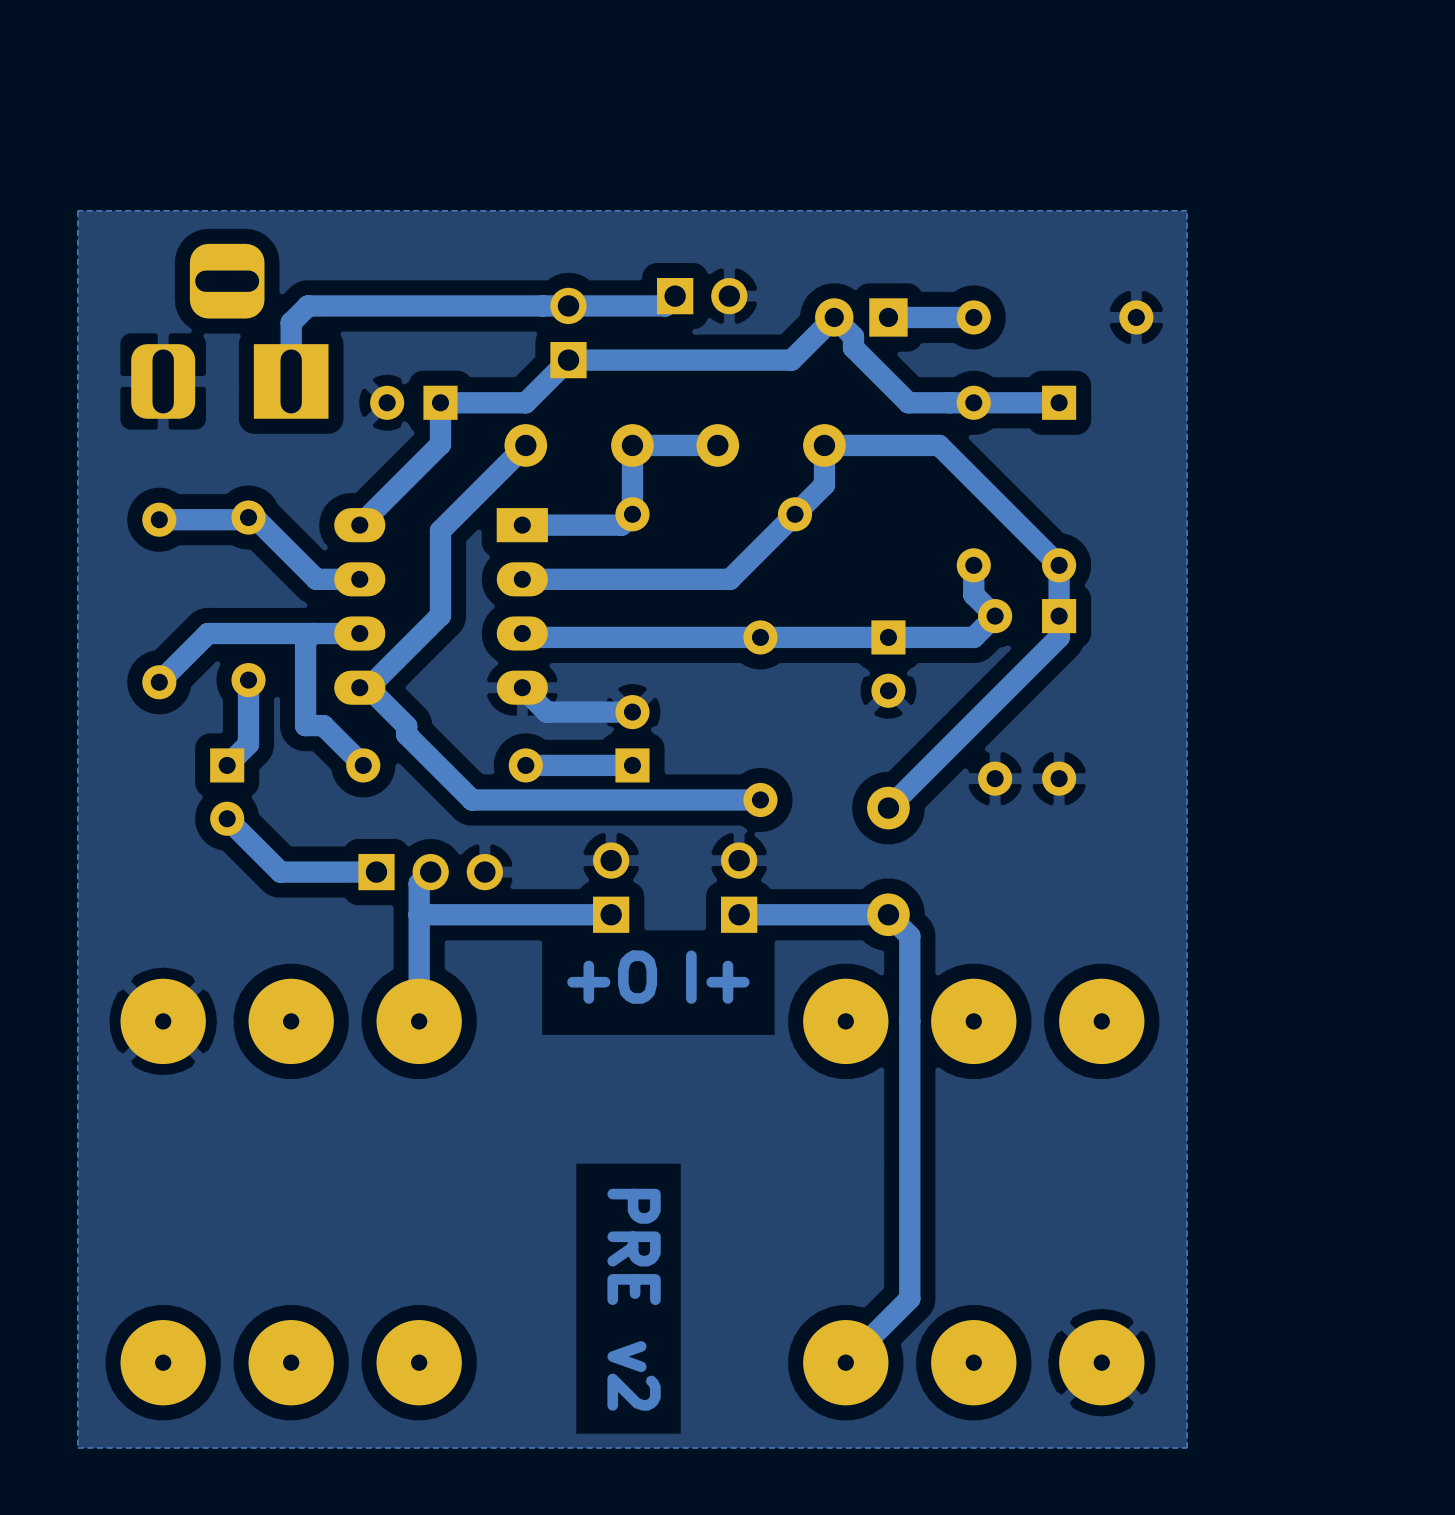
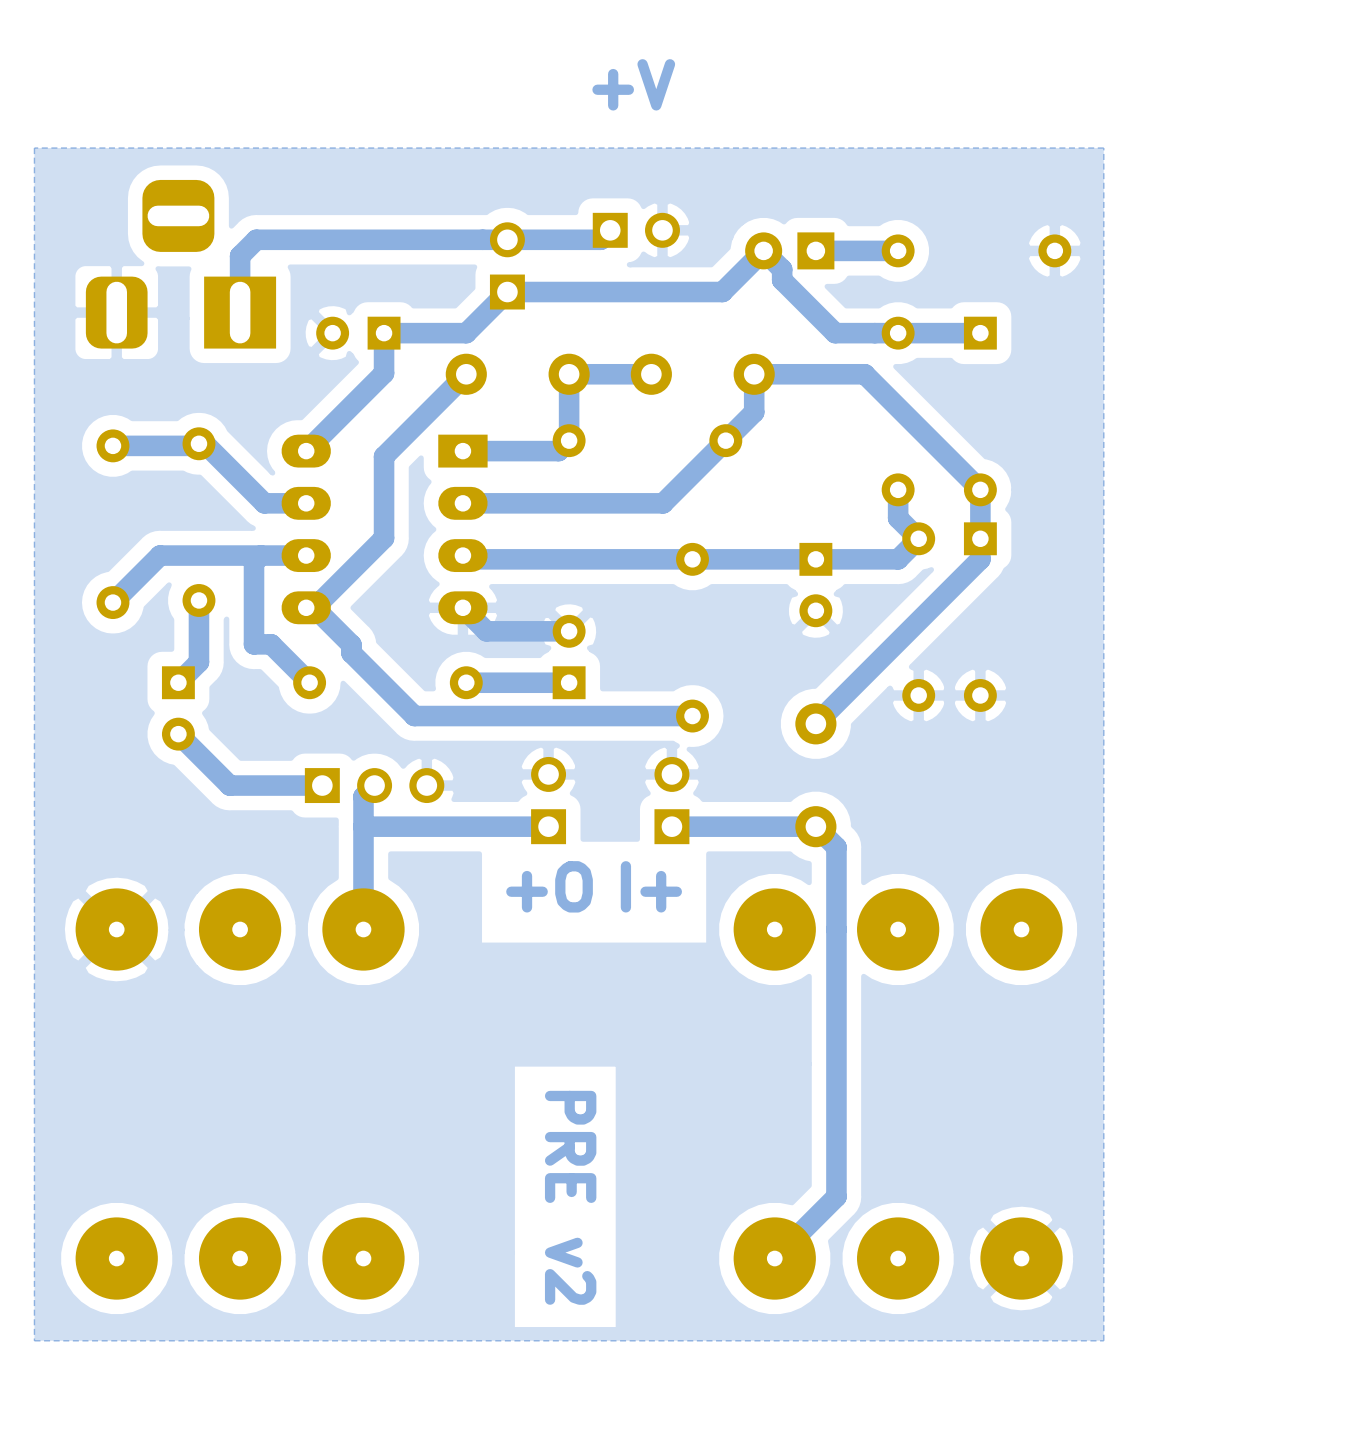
text: none -> +V (633, 84)

